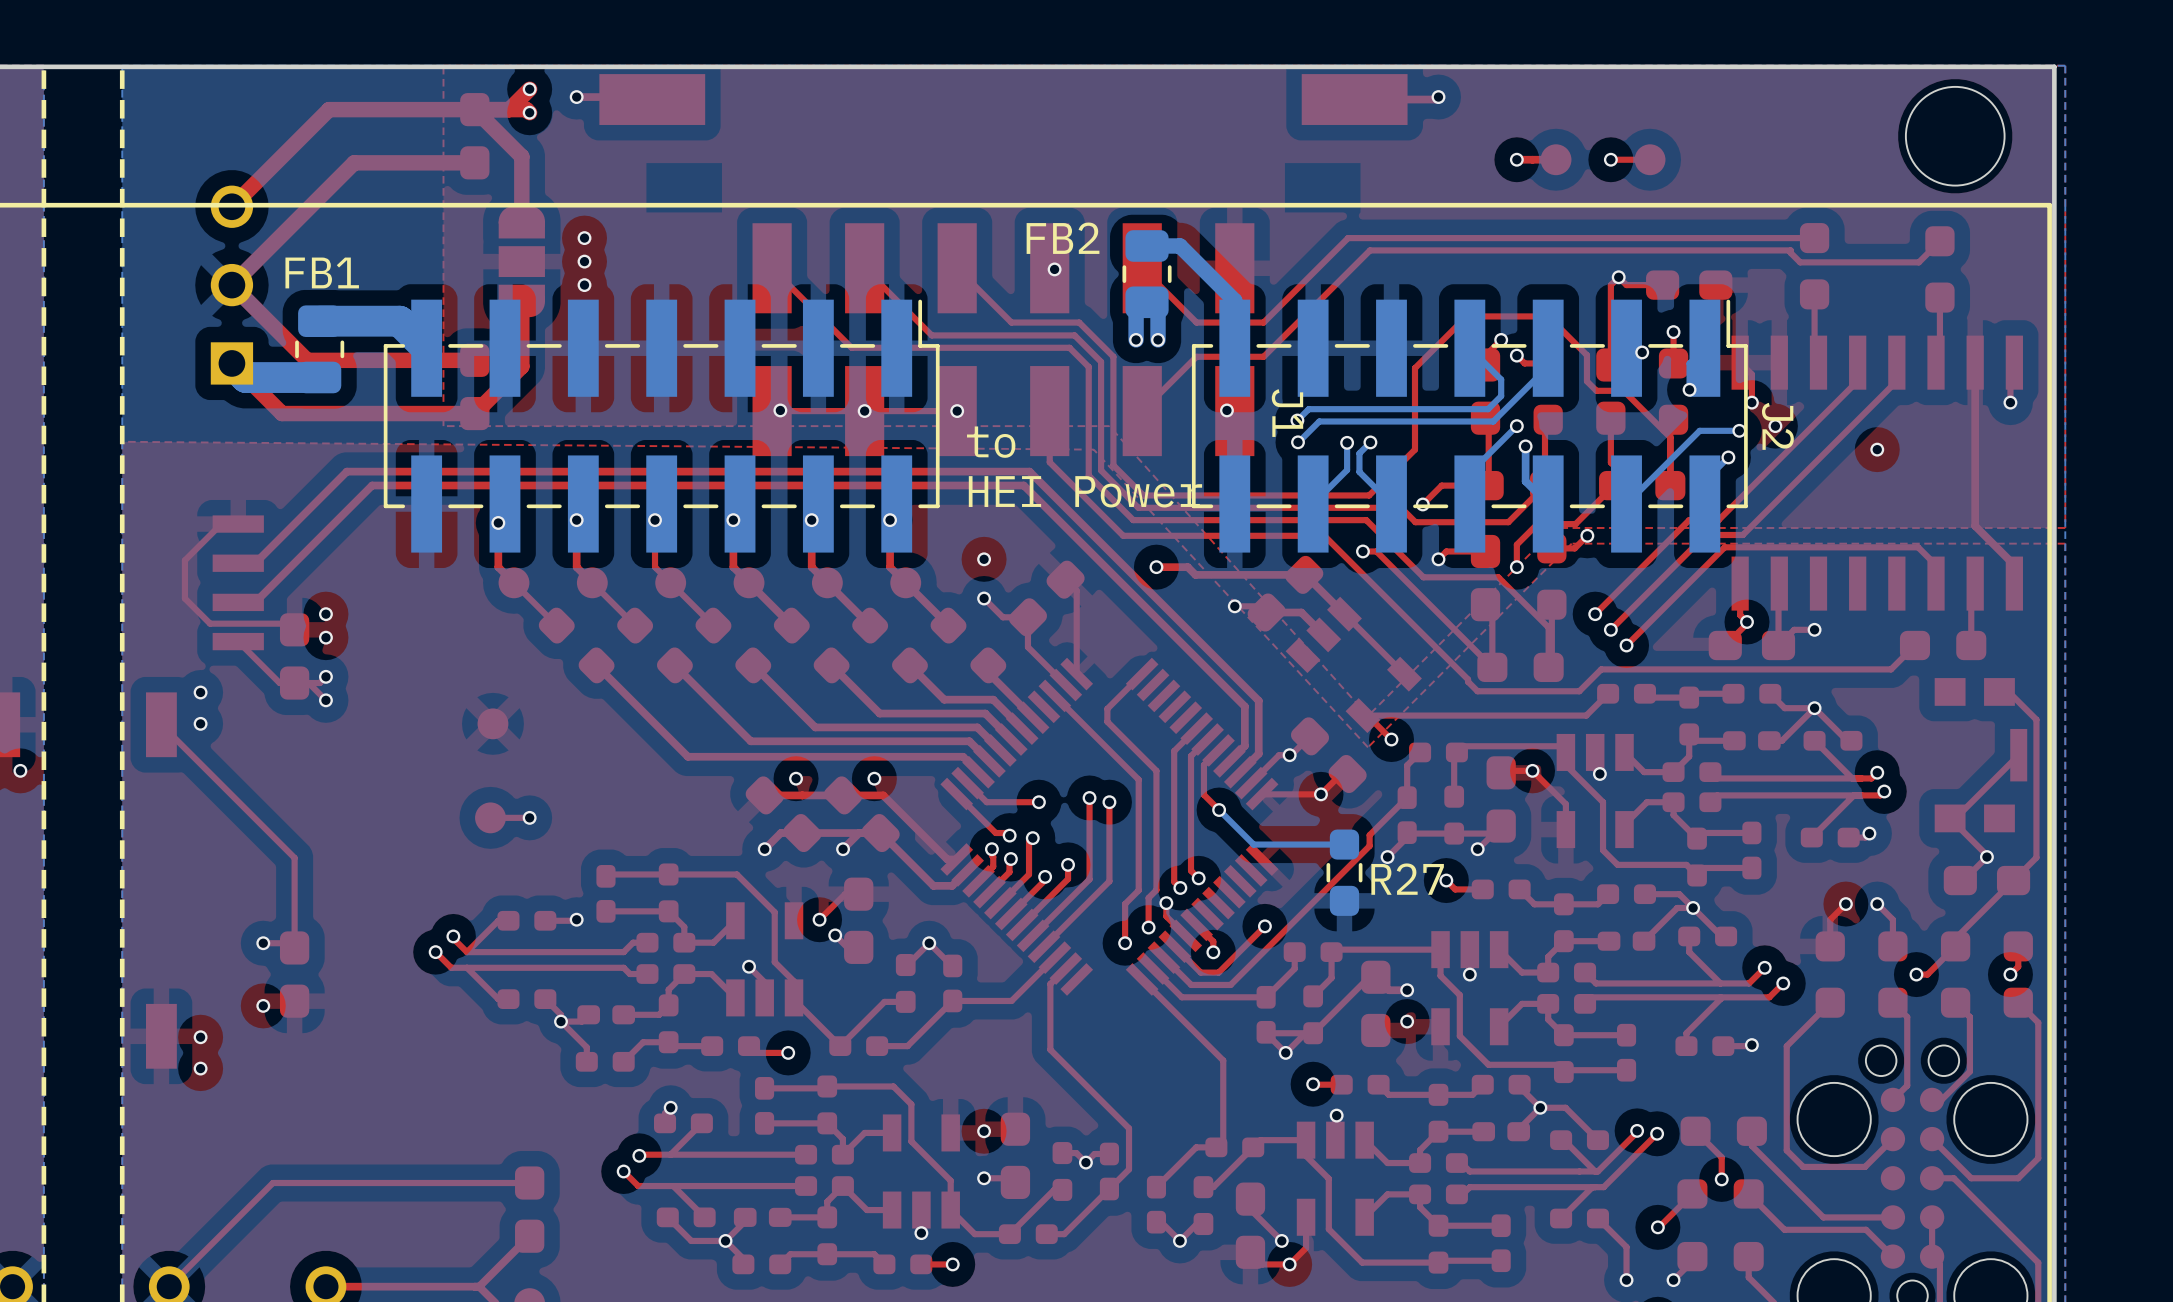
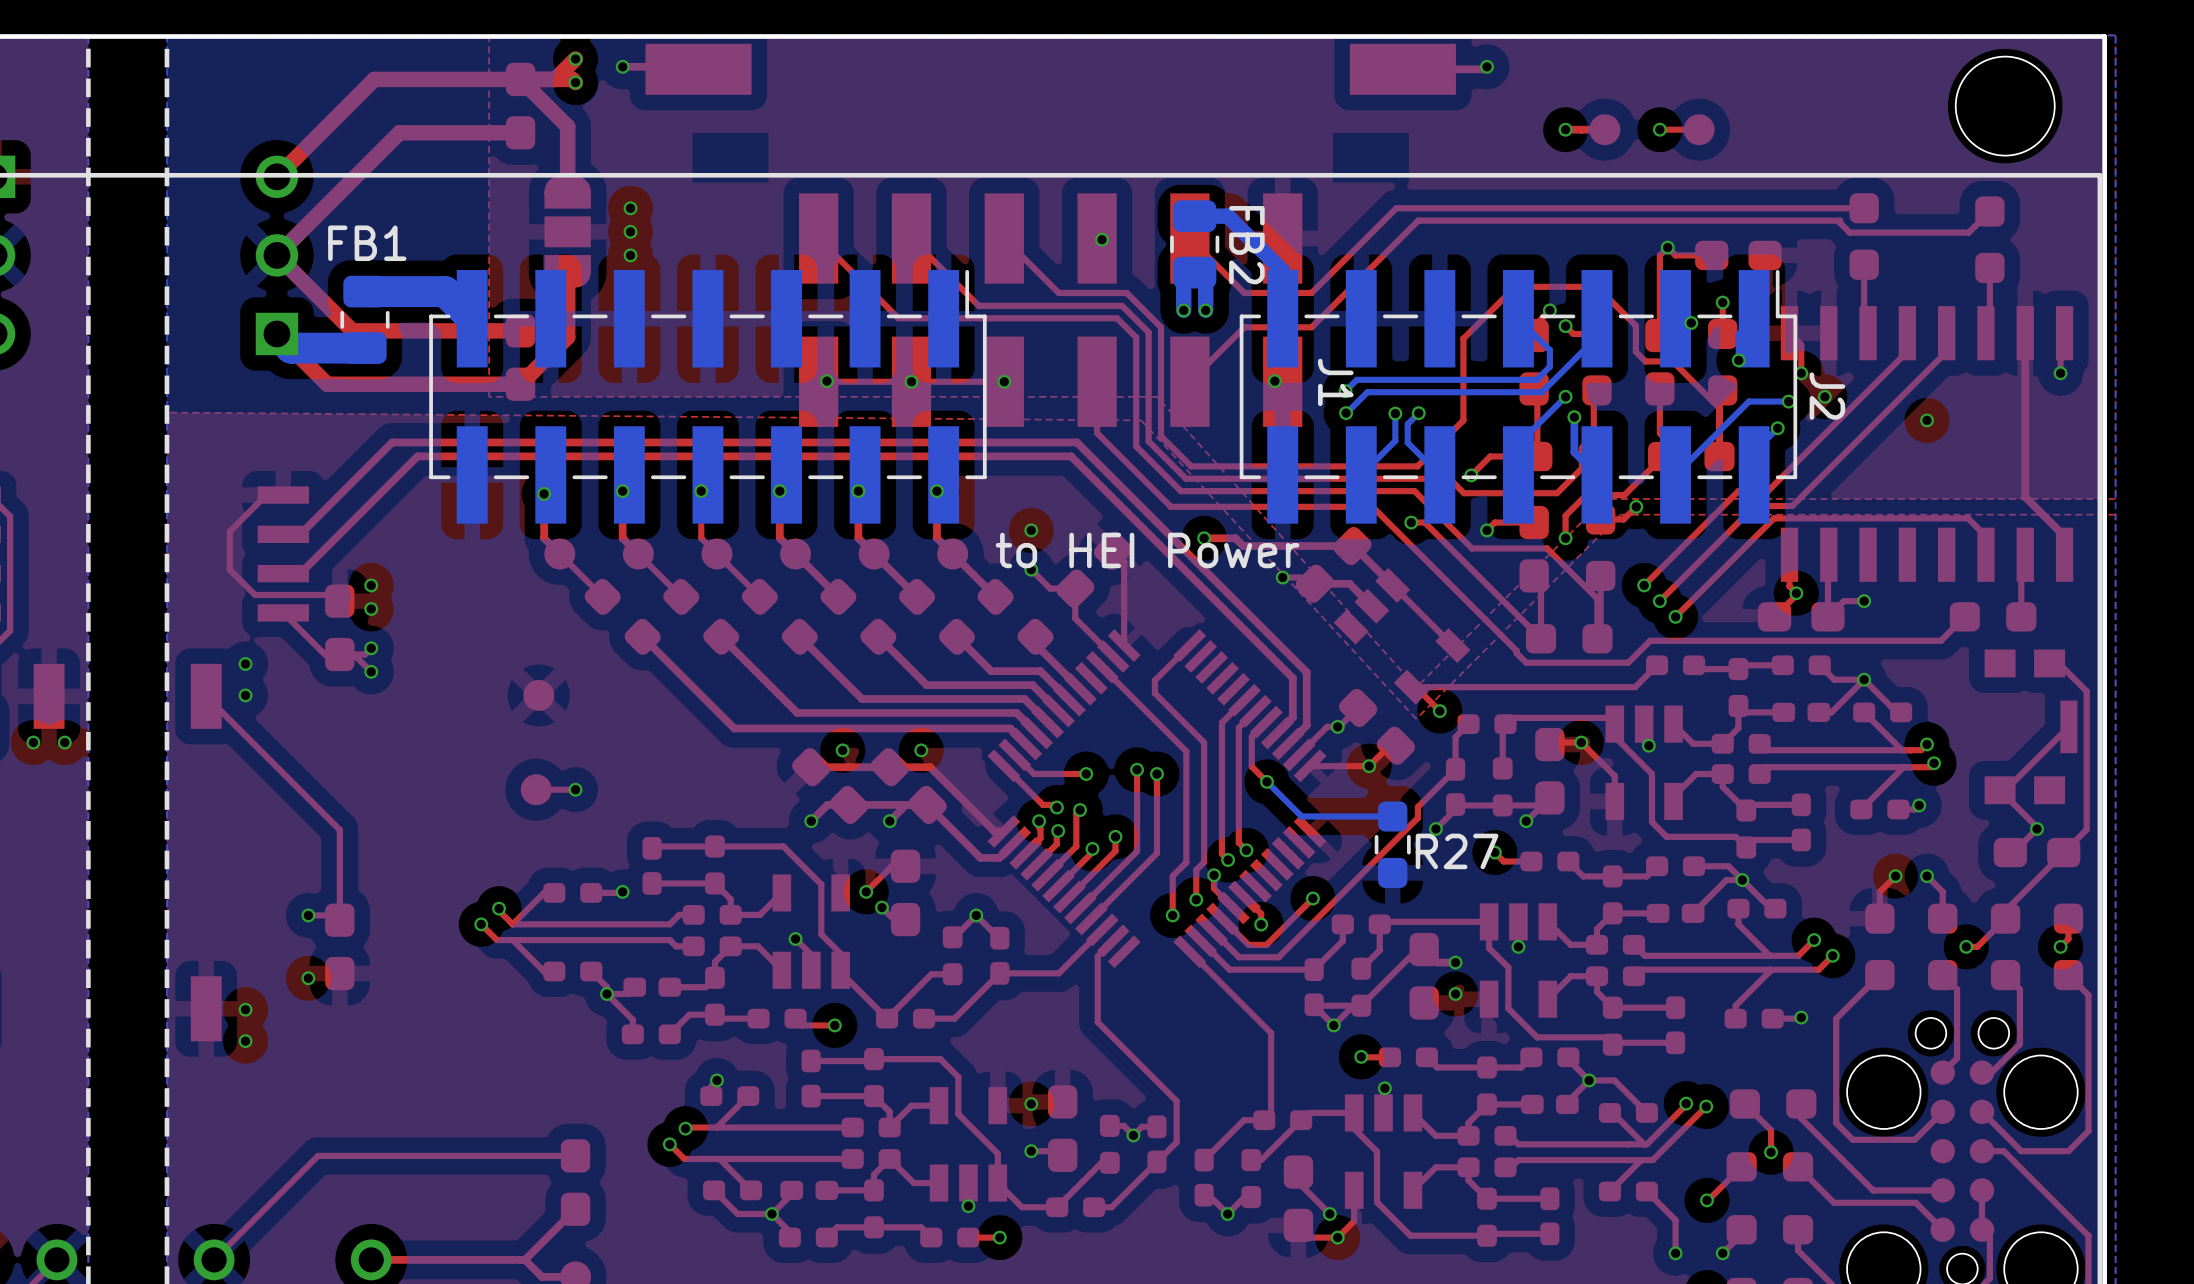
FB2 name rotation: 0° (1063, 238) -> 90° clockwise (1246, 245)
FB2 name position: FB2 (1063, 238) -> FB2 (1246, 245)
text: to (991, 442) -> none
text: HEI Power (1085, 491) -> none
text: none -> to HEI Power (1147, 550)

